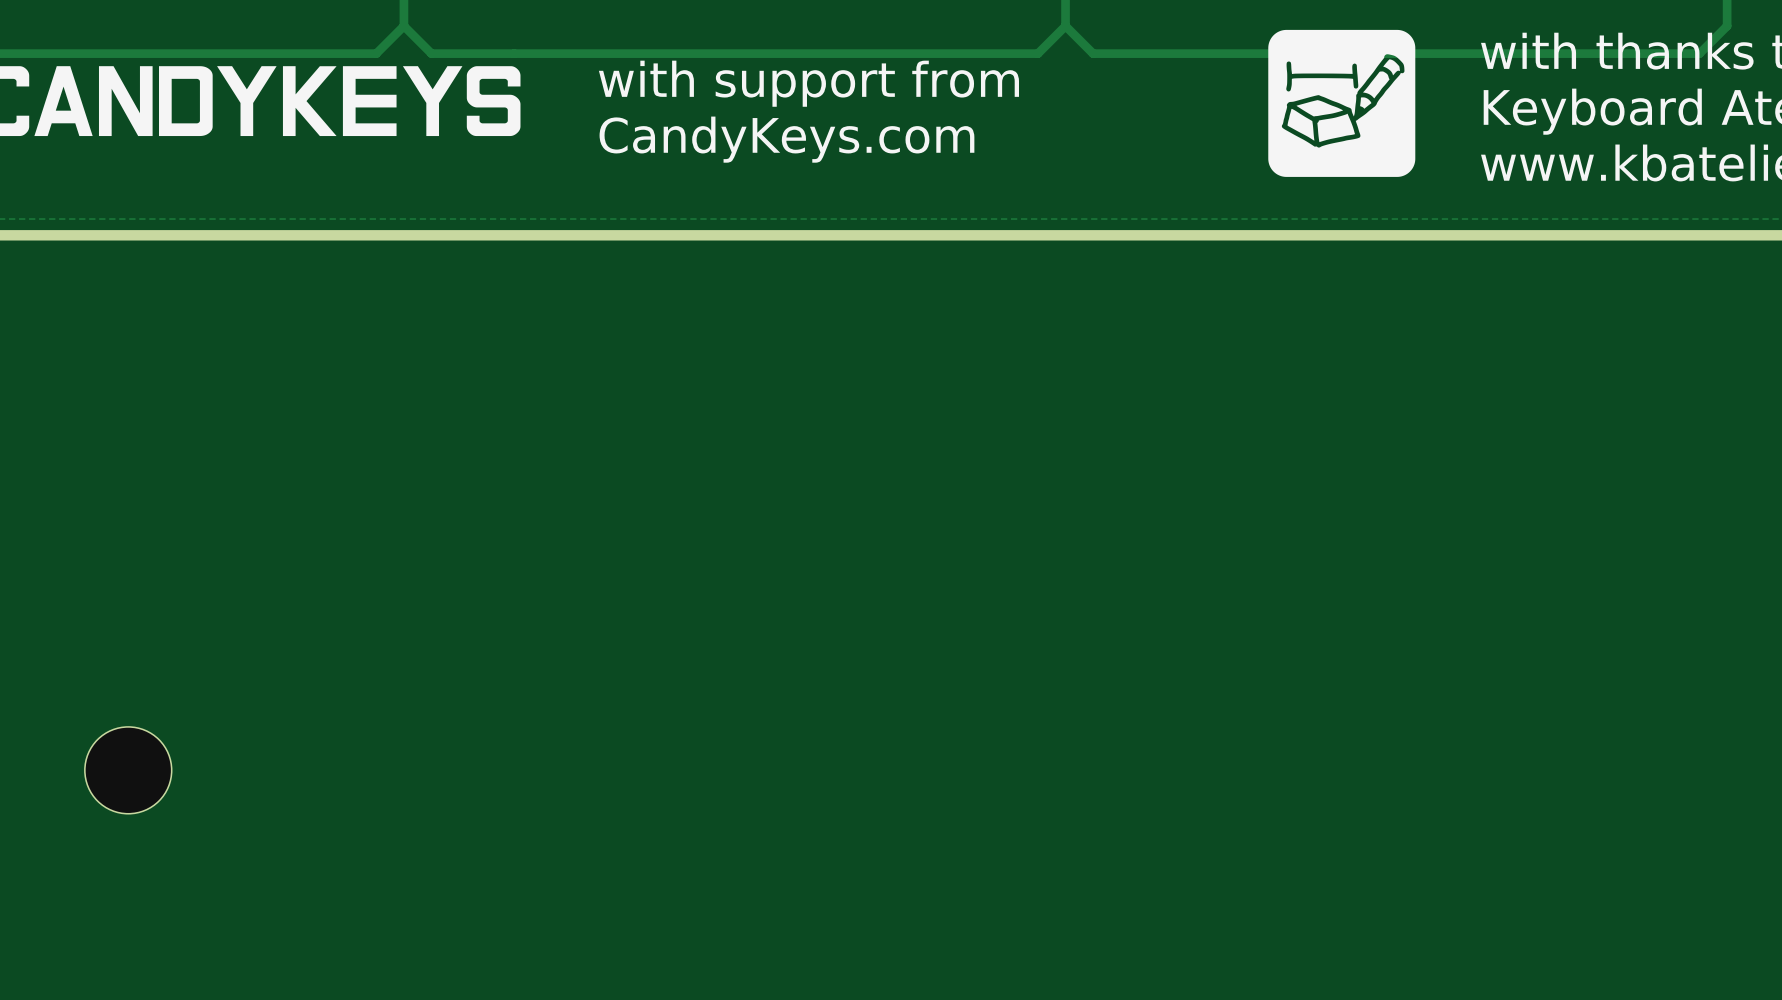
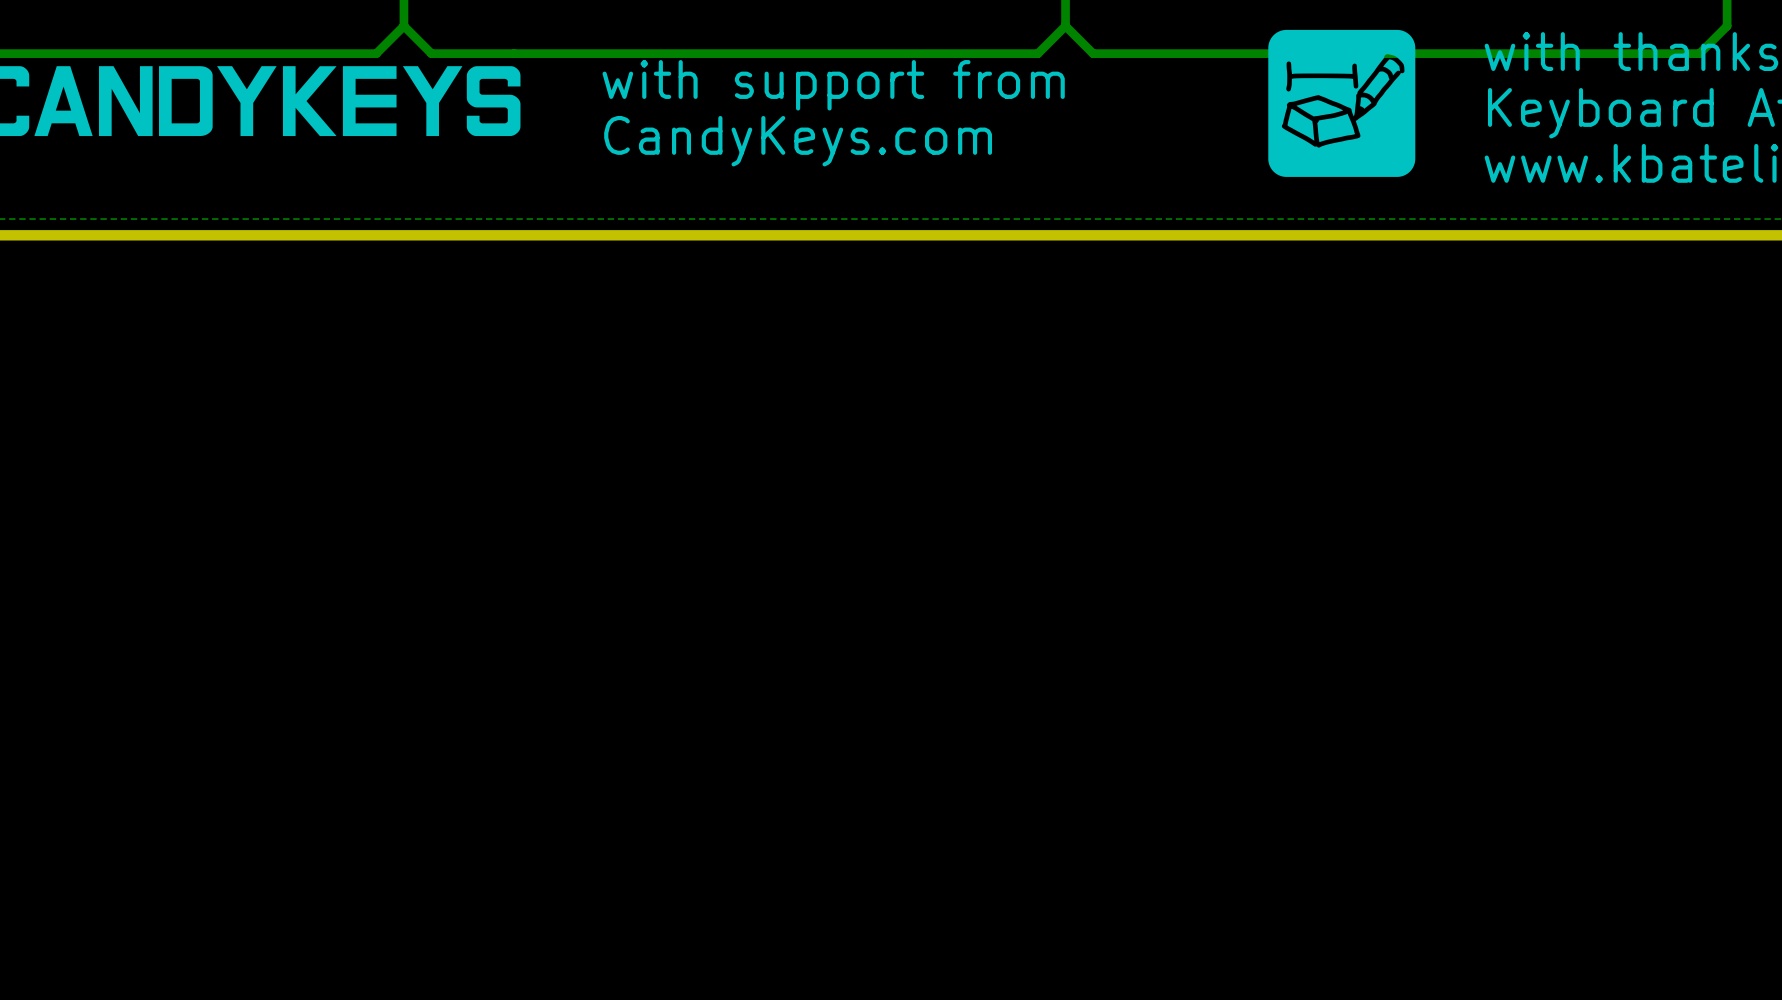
part: (128, 770) -> none

